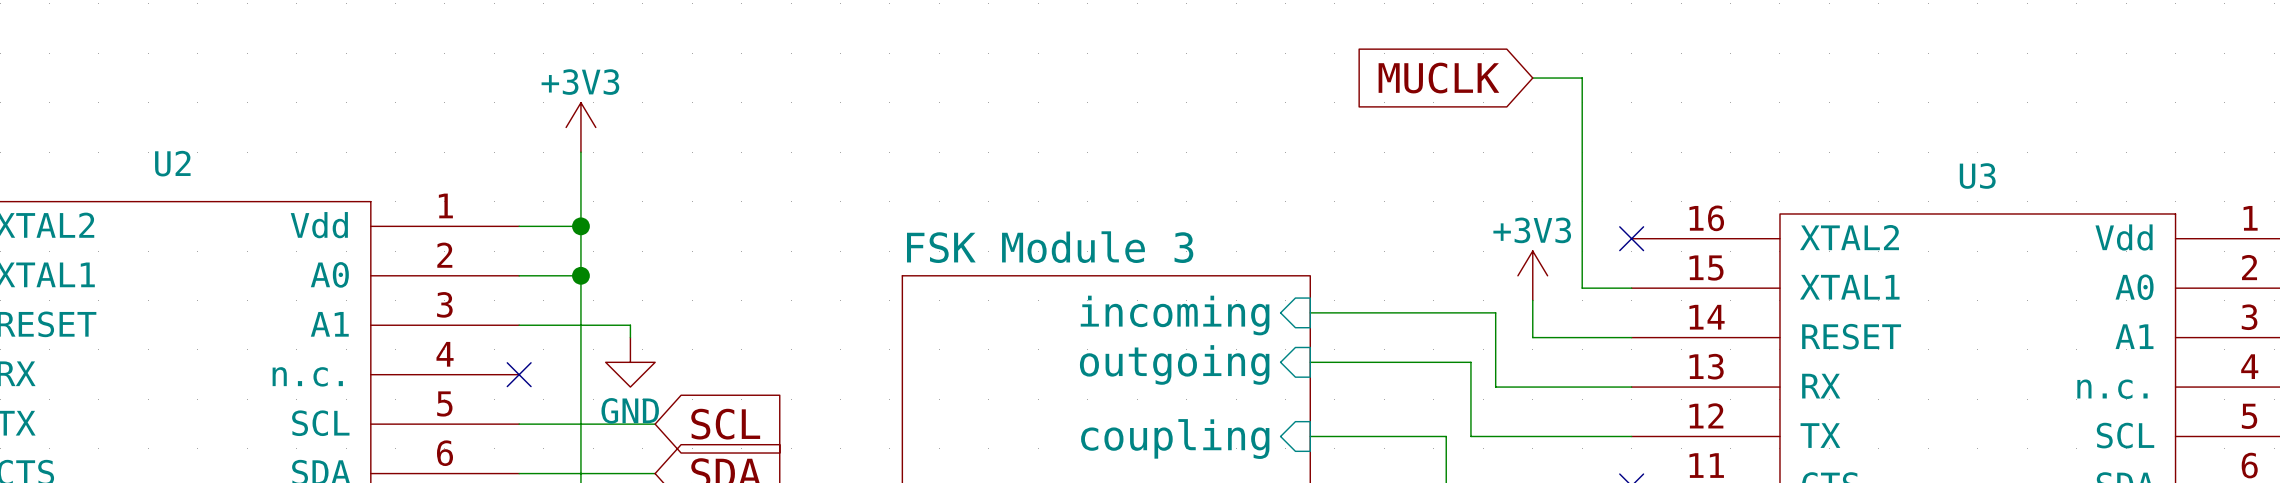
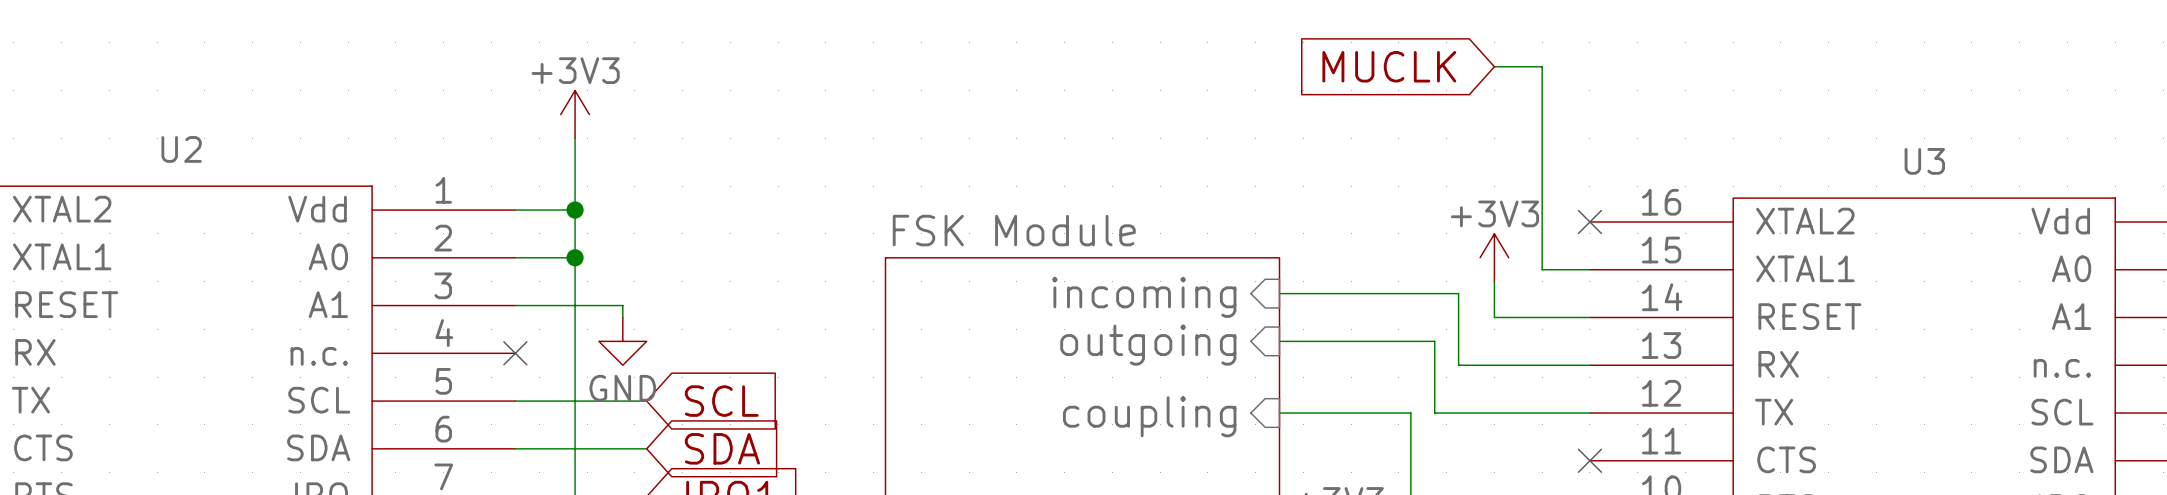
sheet FSK Module 3 name: FSK Module 3 (1050, 247) -> FSK Module (1014, 230)

